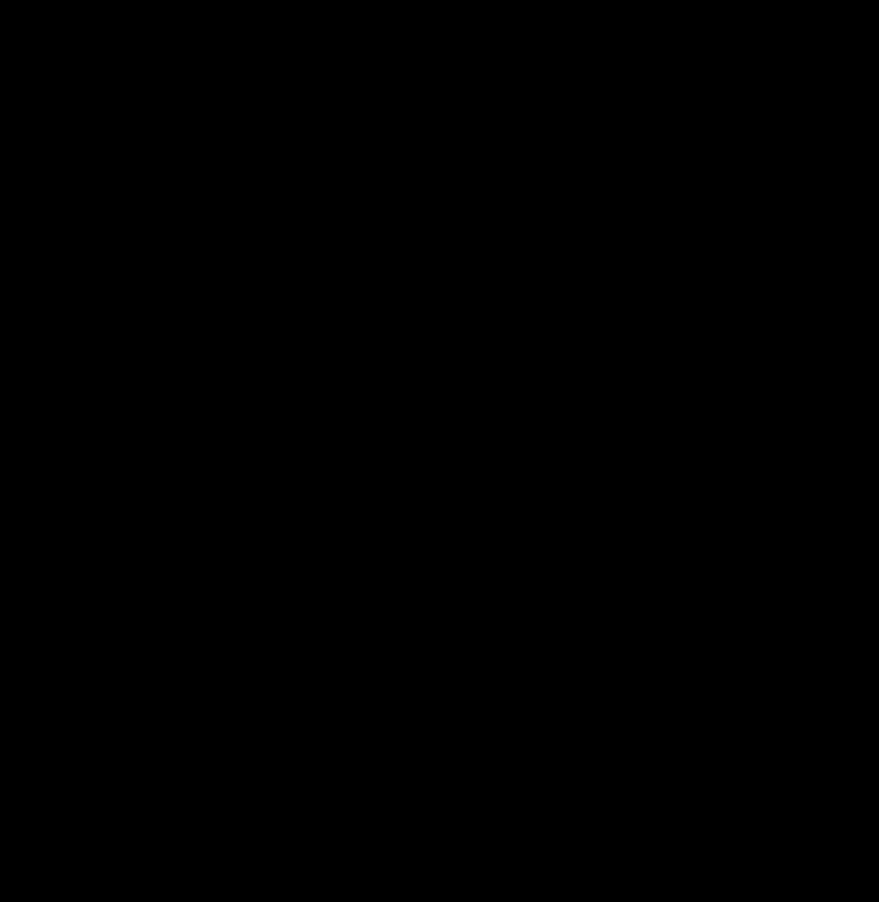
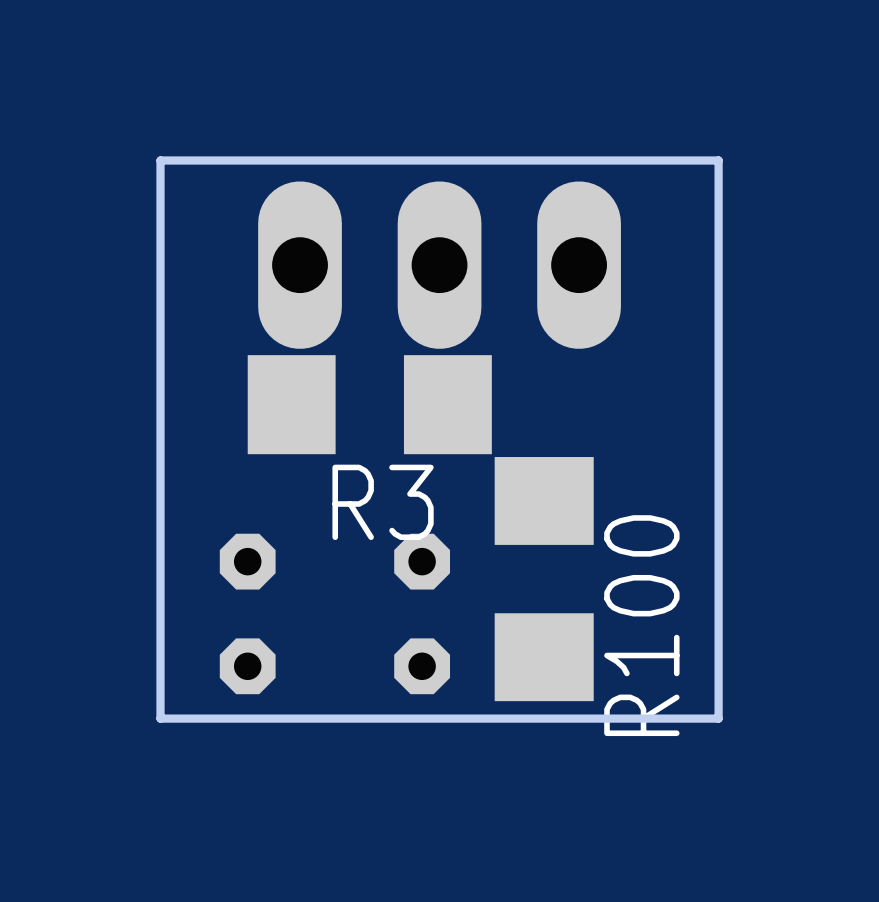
board edge: none -> (718, 160) (718, 718) (160, 718) (160, 160) (718, 160)
part: none -> (439, 265)
R3: none -> (369, 404)
R100: none -> (544, 579)
part: none -> (334, 613)

